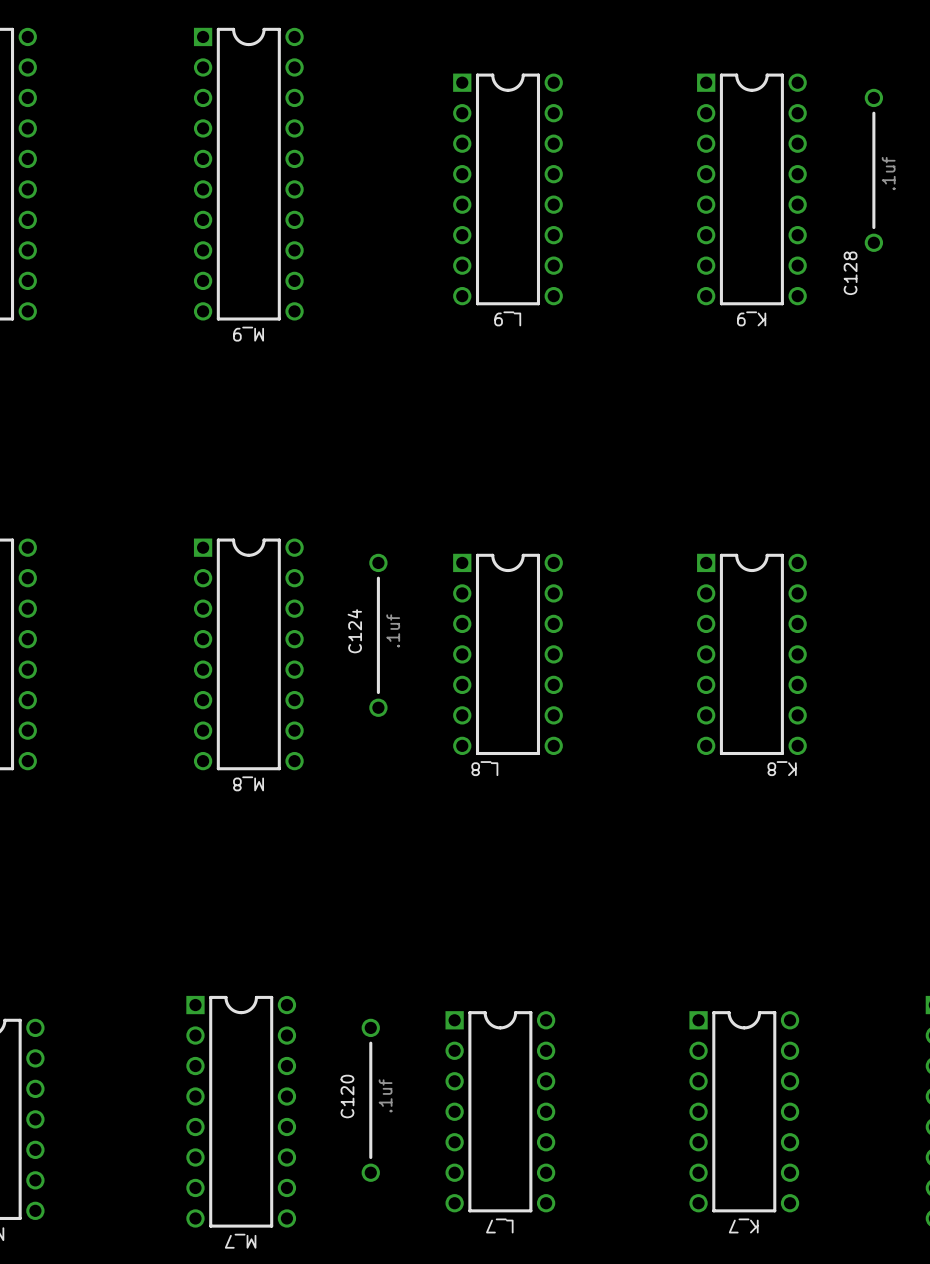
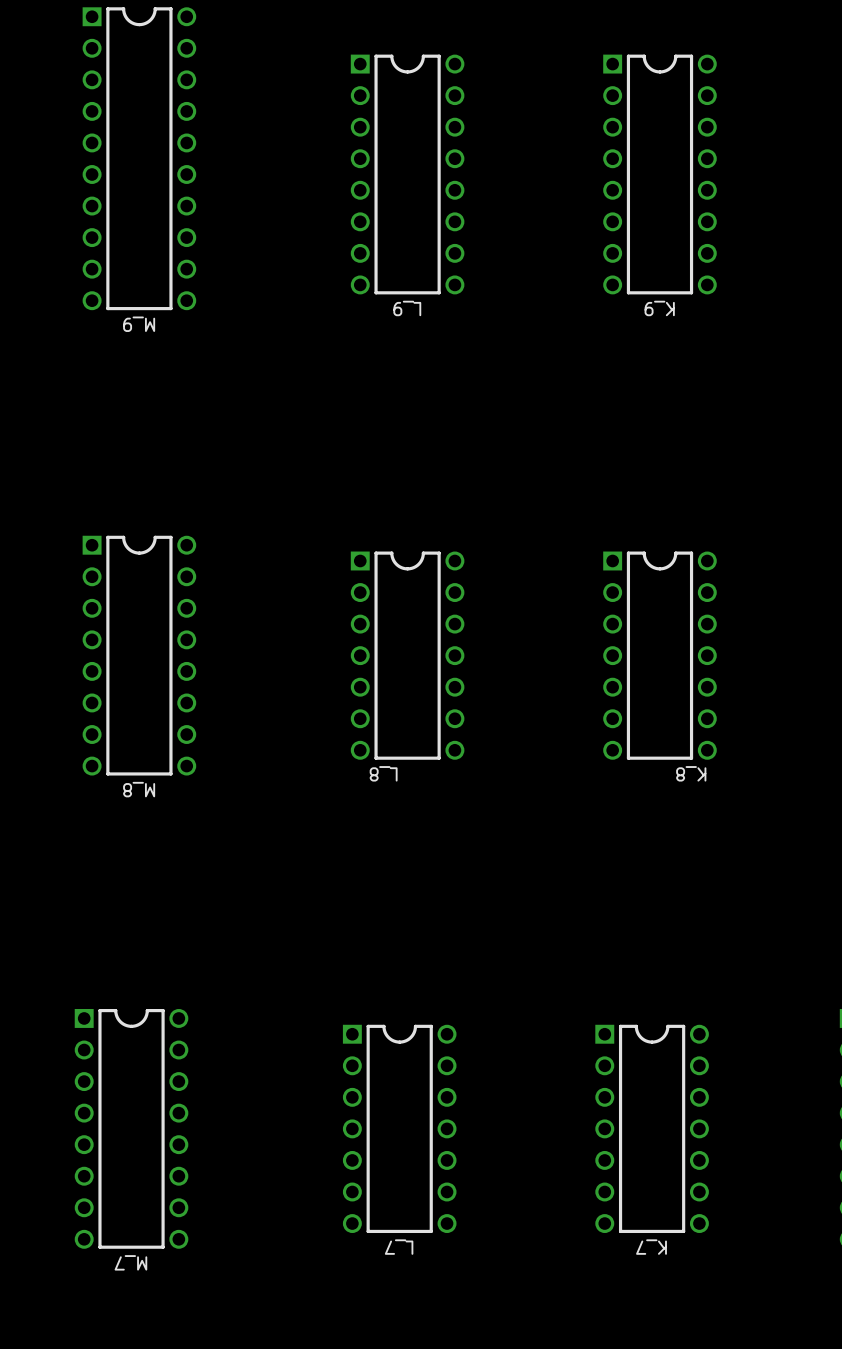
C128: .1uf (873, 170) -> none
C124: .1uf (378, 635) -> none
C120: .1uf (370, 1100) -> none

